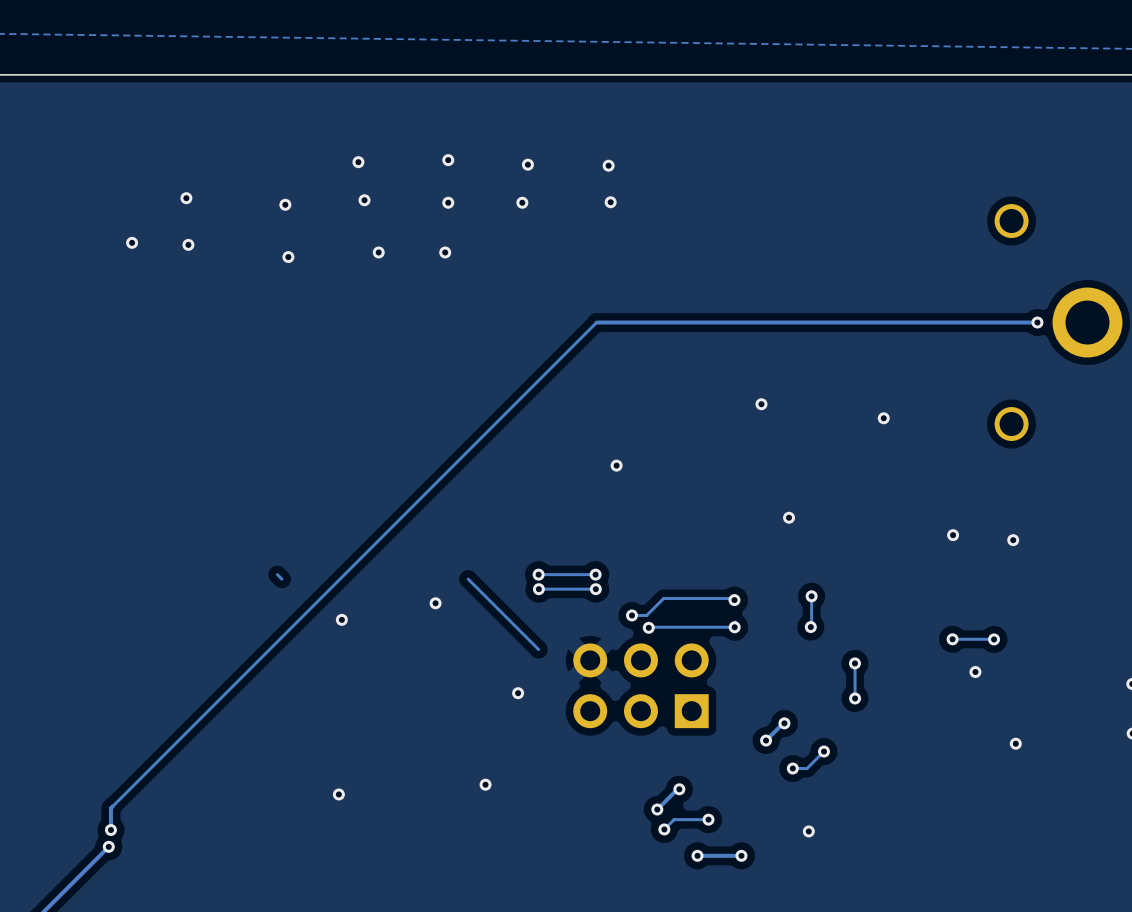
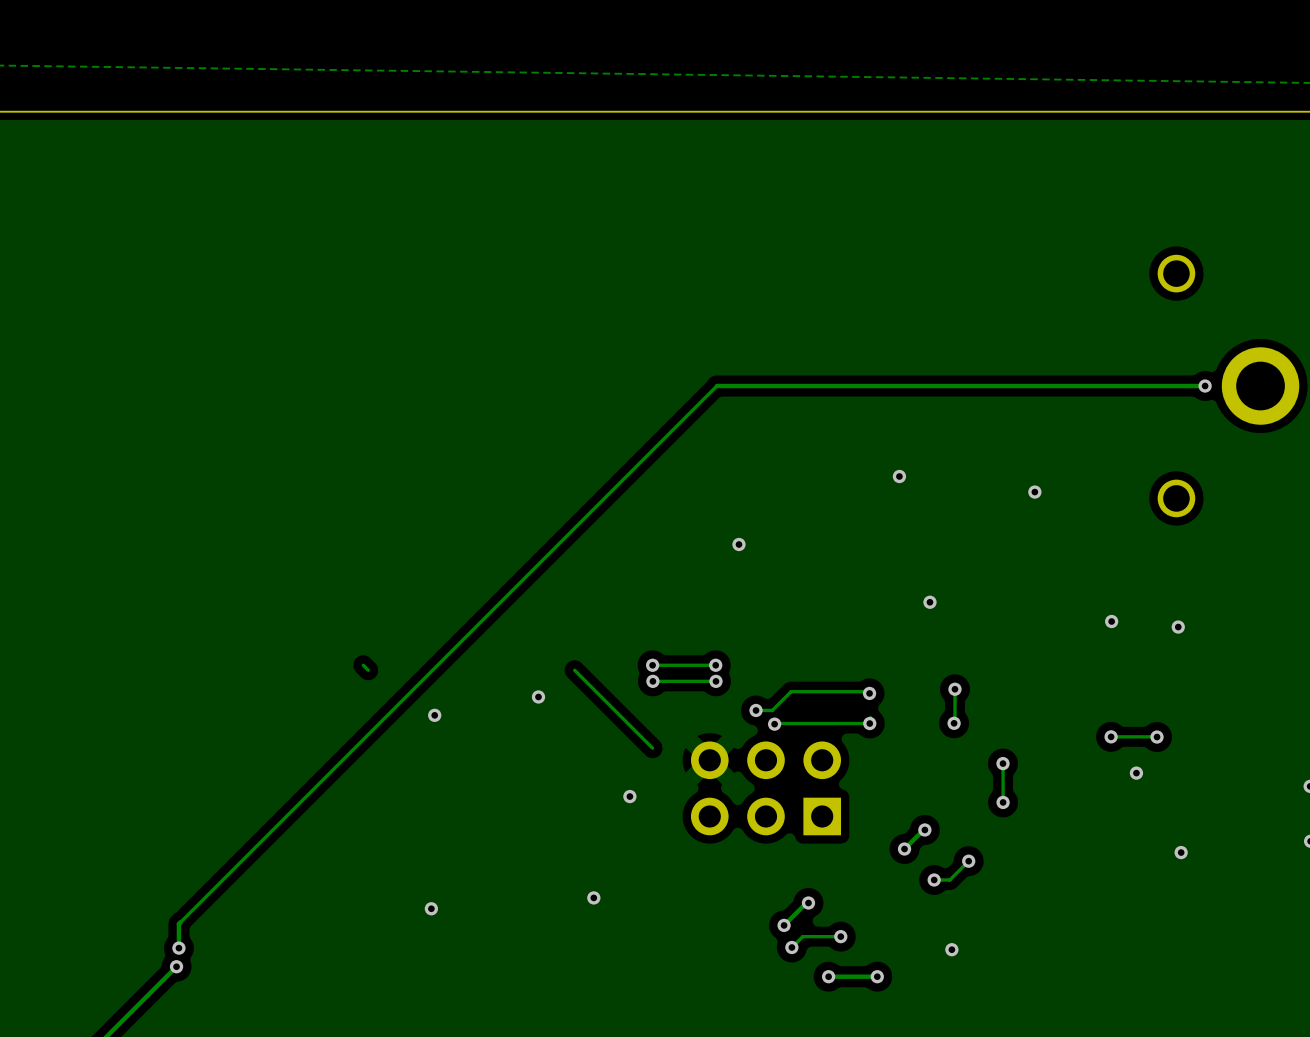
via: (448, 160) -> none
via: (358, 162) -> none
via: (527, 164) -> none
via: (608, 165) -> none
via: (186, 198) -> none
via: (364, 200) -> none
via: (448, 202) -> none
via: (522, 202) -> none
via: (610, 202) -> none
via: (285, 204) -> none
via: (132, 242) -> none
via: (188, 244) -> none
via: (378, 252) -> none
via: (445, 252) -> none
via: (288, 257) -> none

